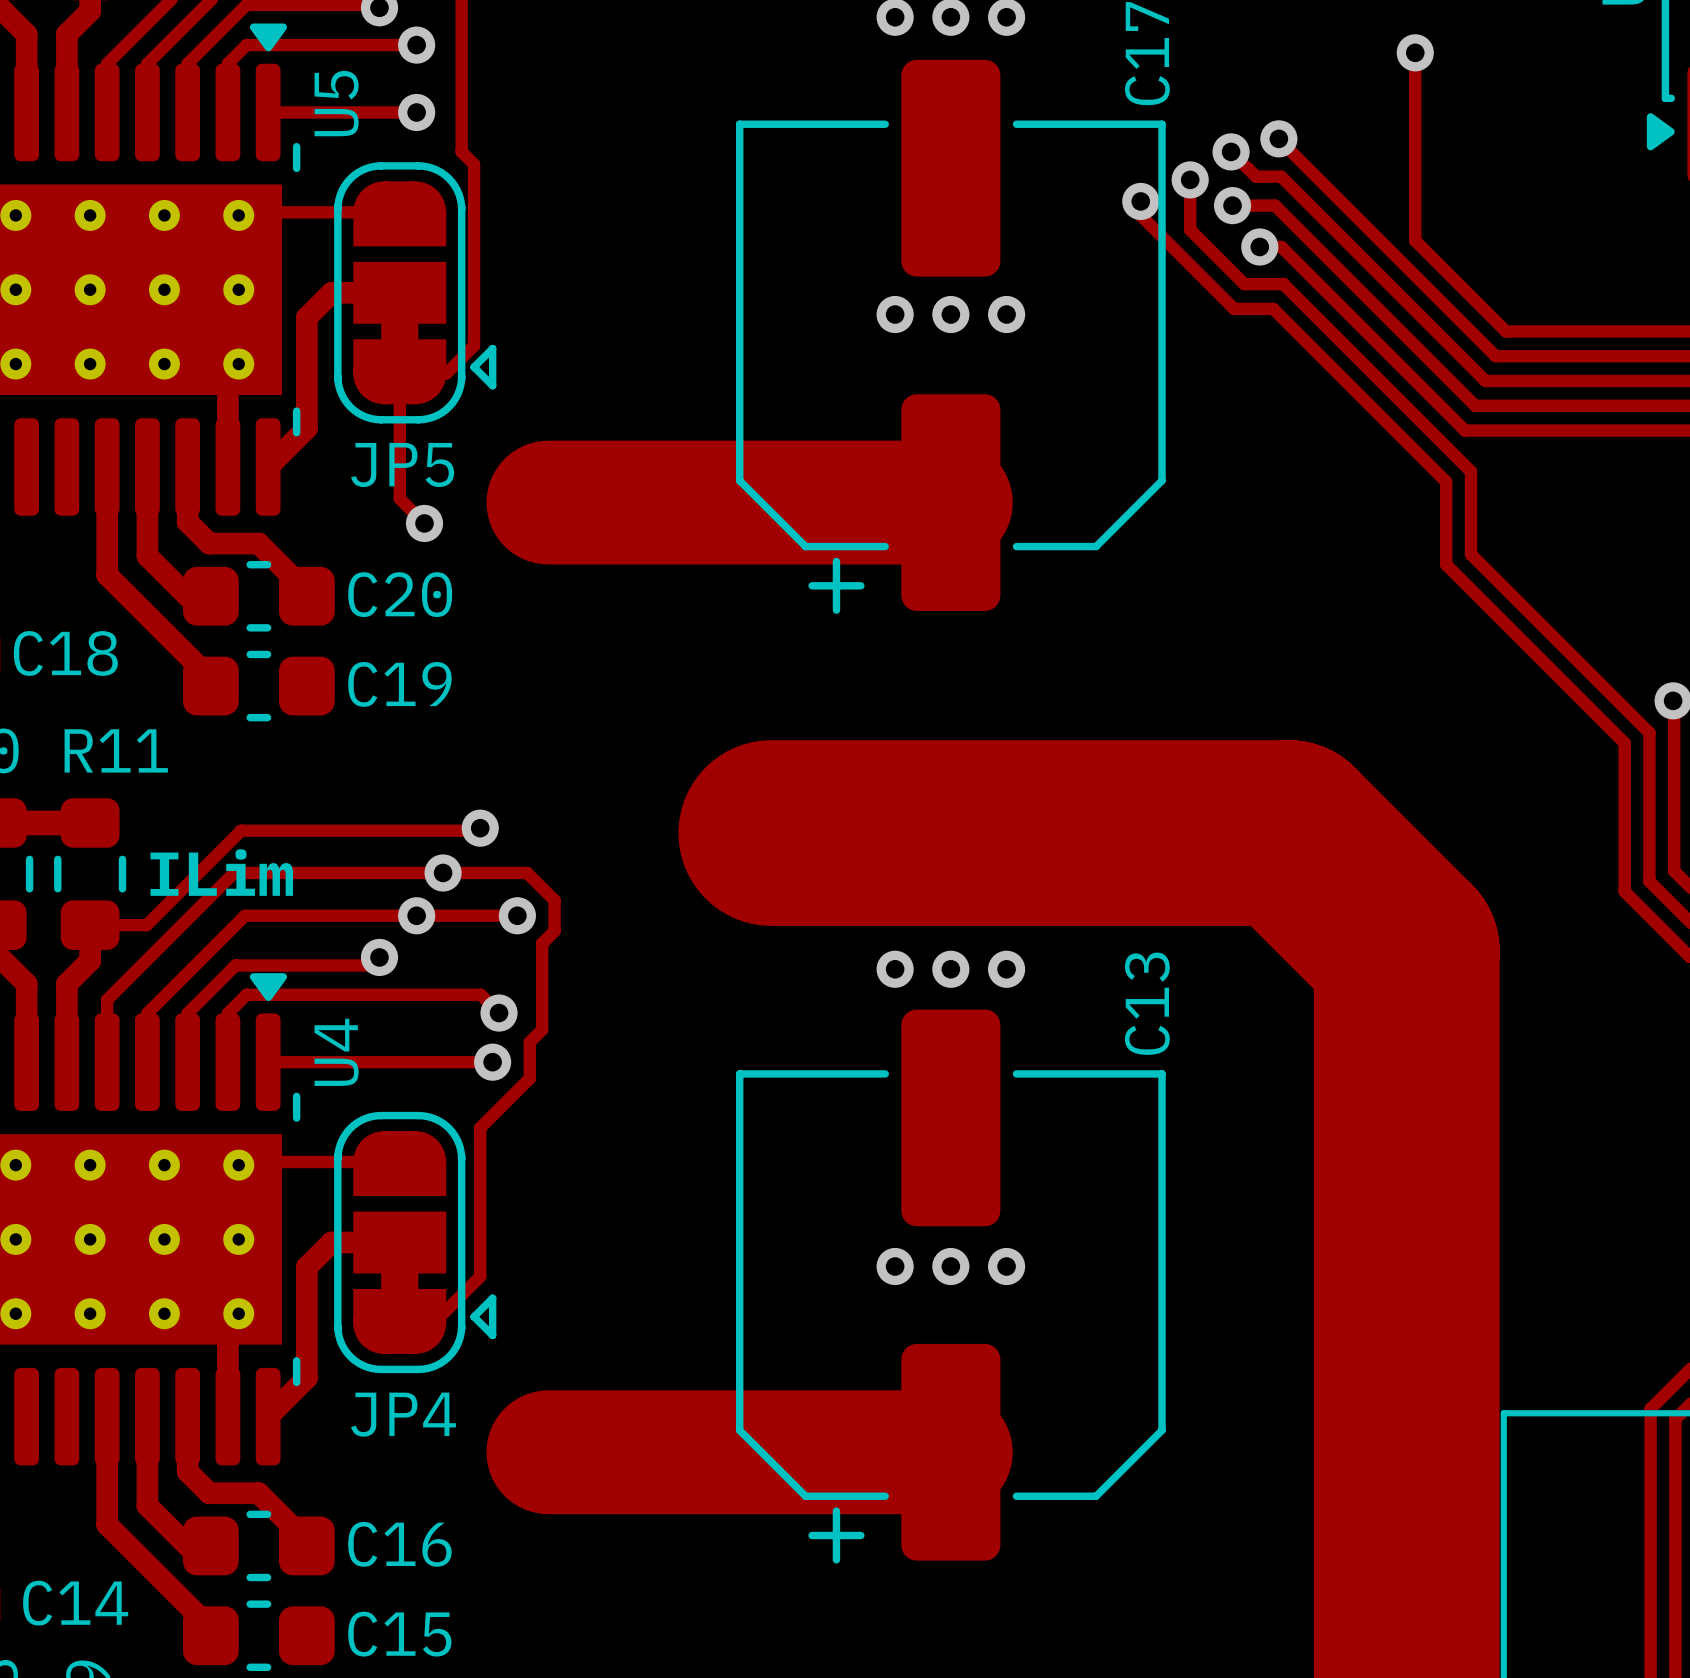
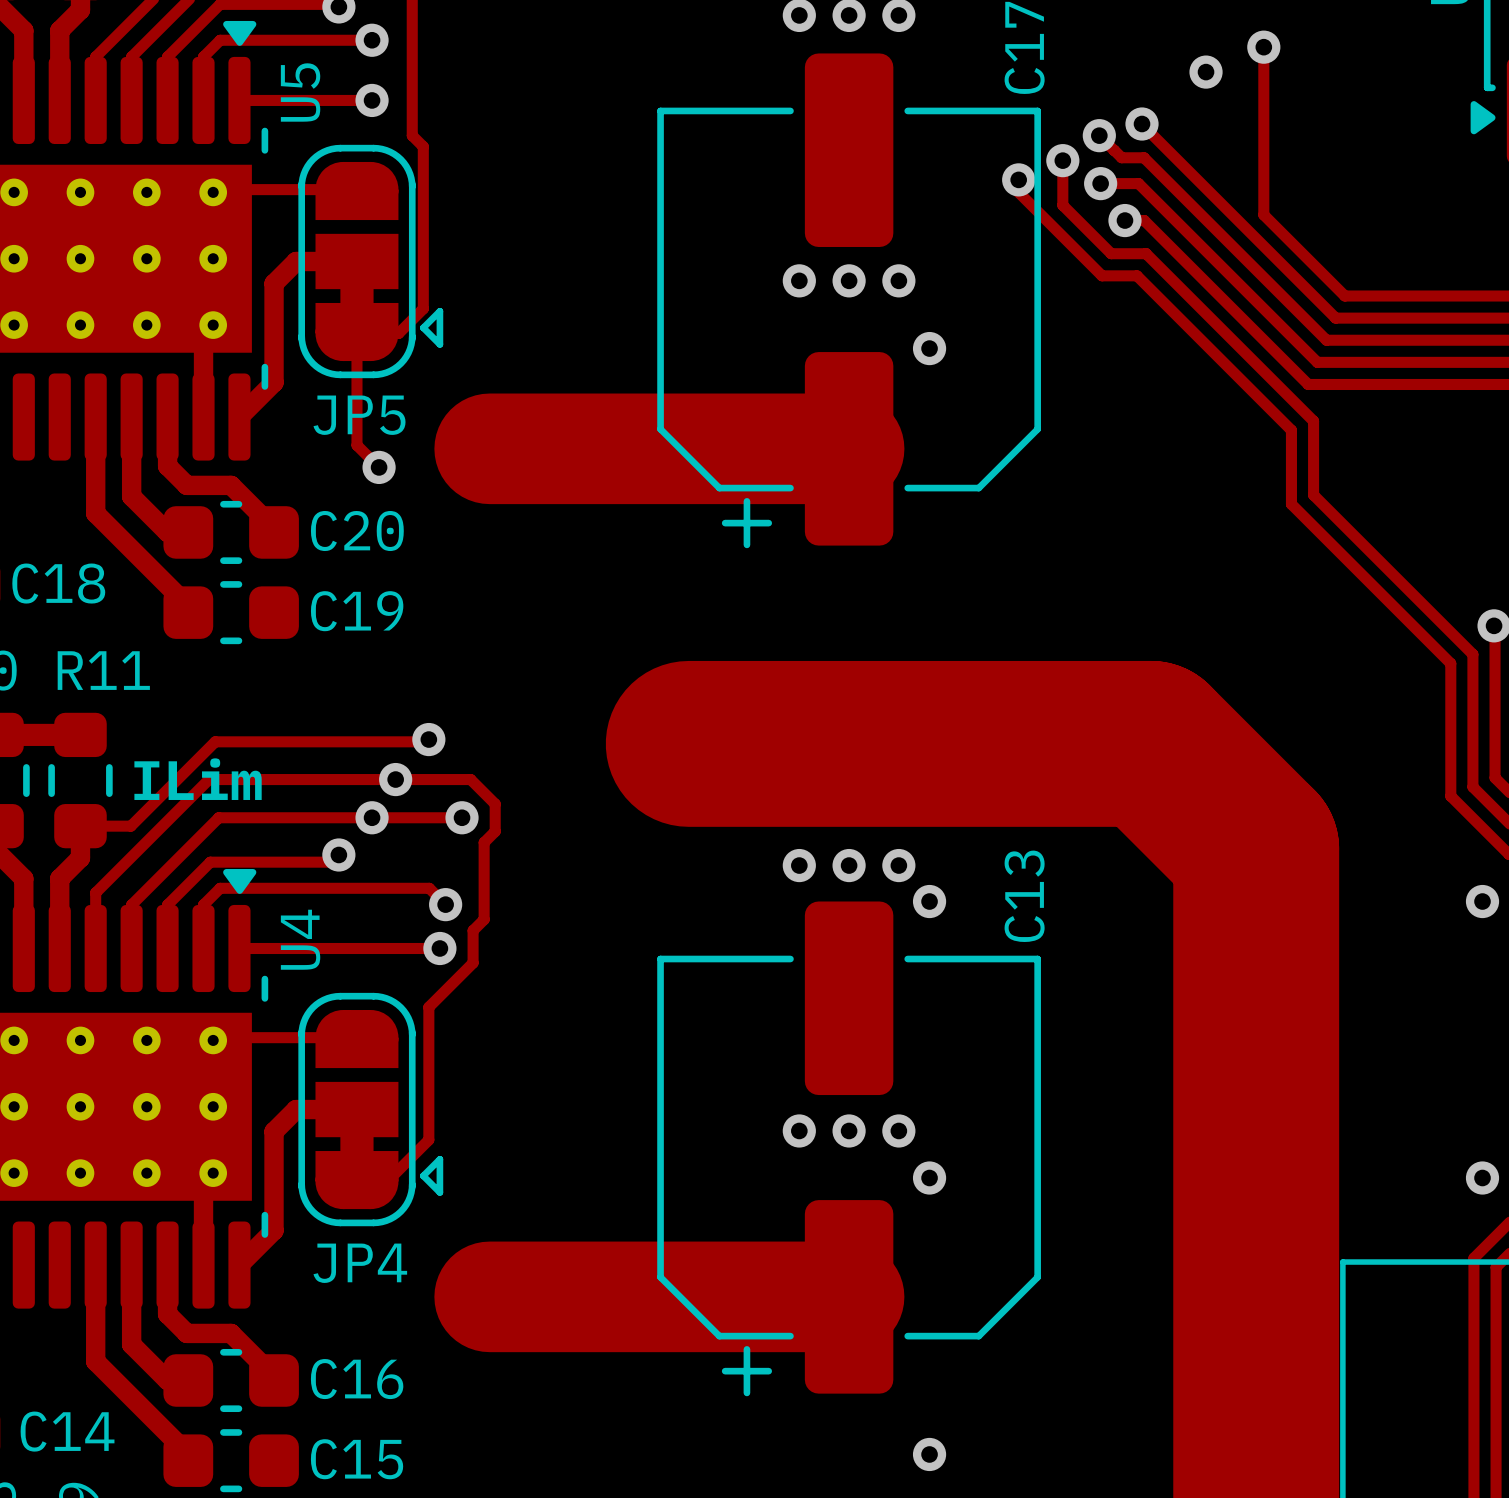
via: none -> (1206, 72)
via: none -> (929, 348)
via: none -> (929, 901)
via: none -> (1482, 901)
via: none -> (929, 1178)
via: none -> (1482, 1178)
via: none -> (929, 1454)

